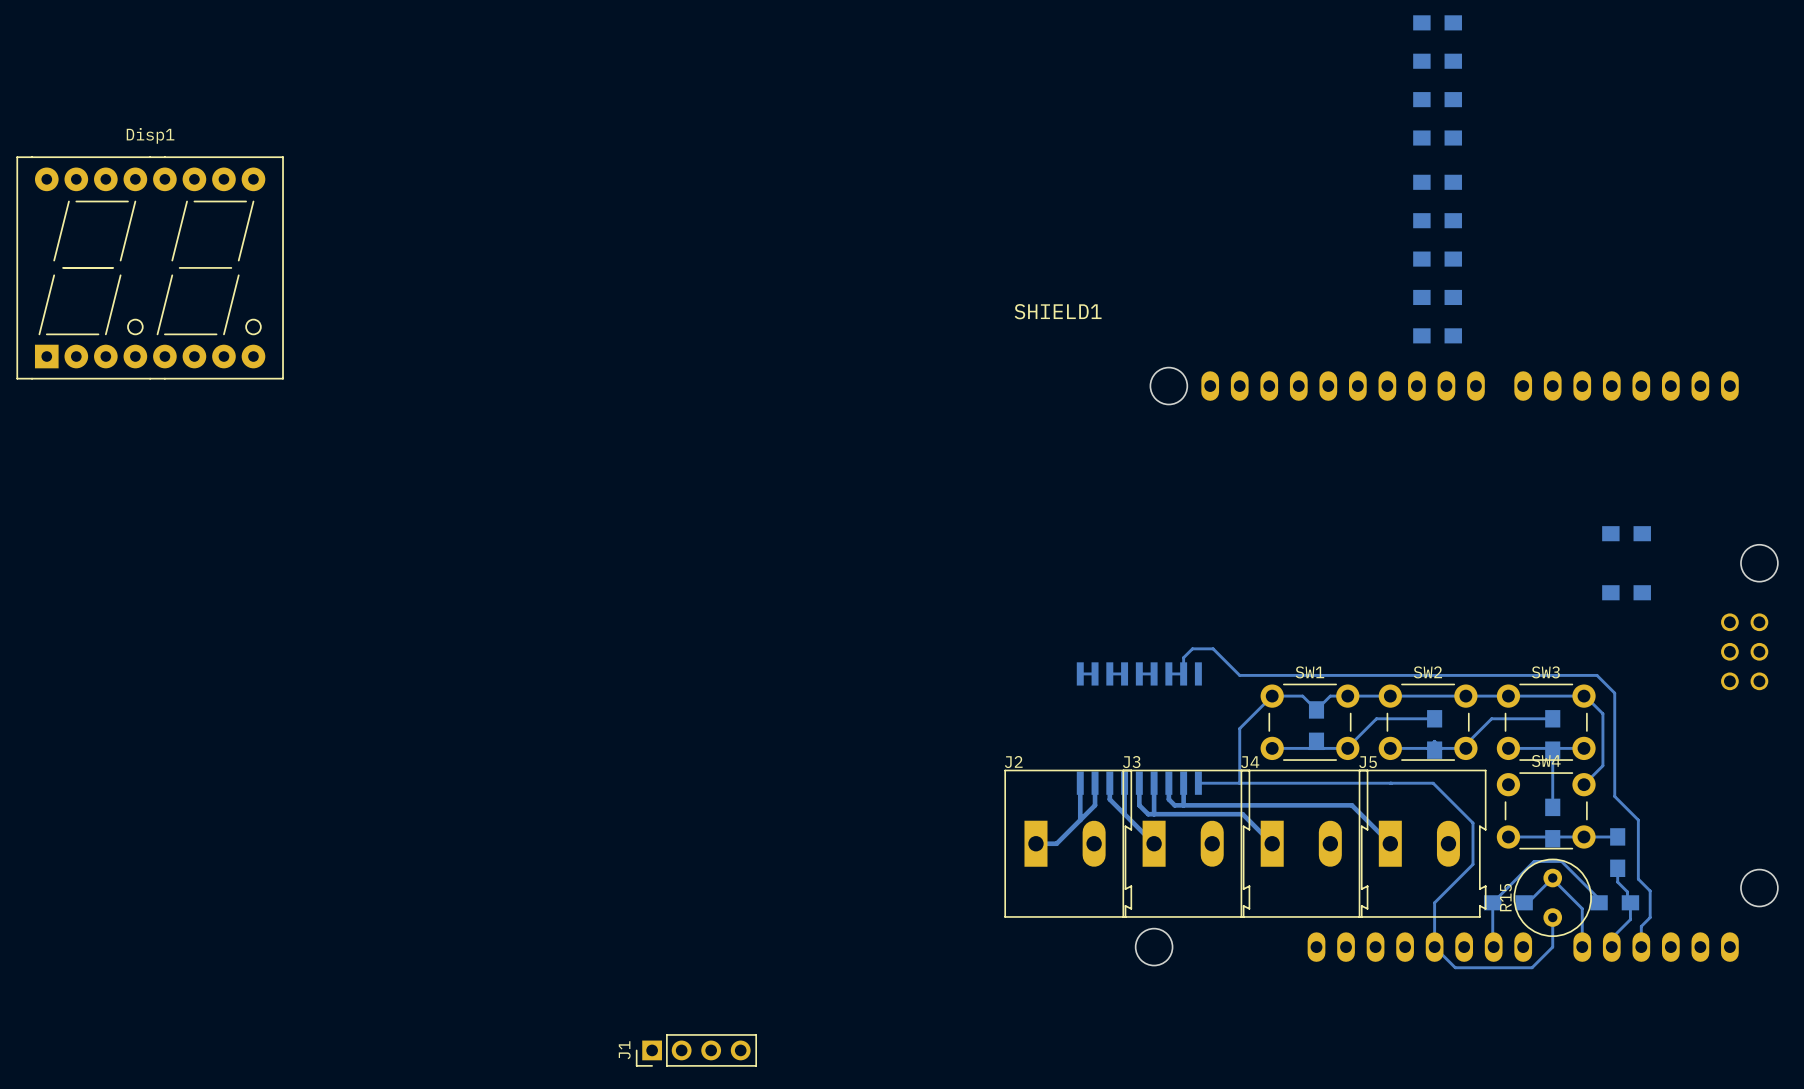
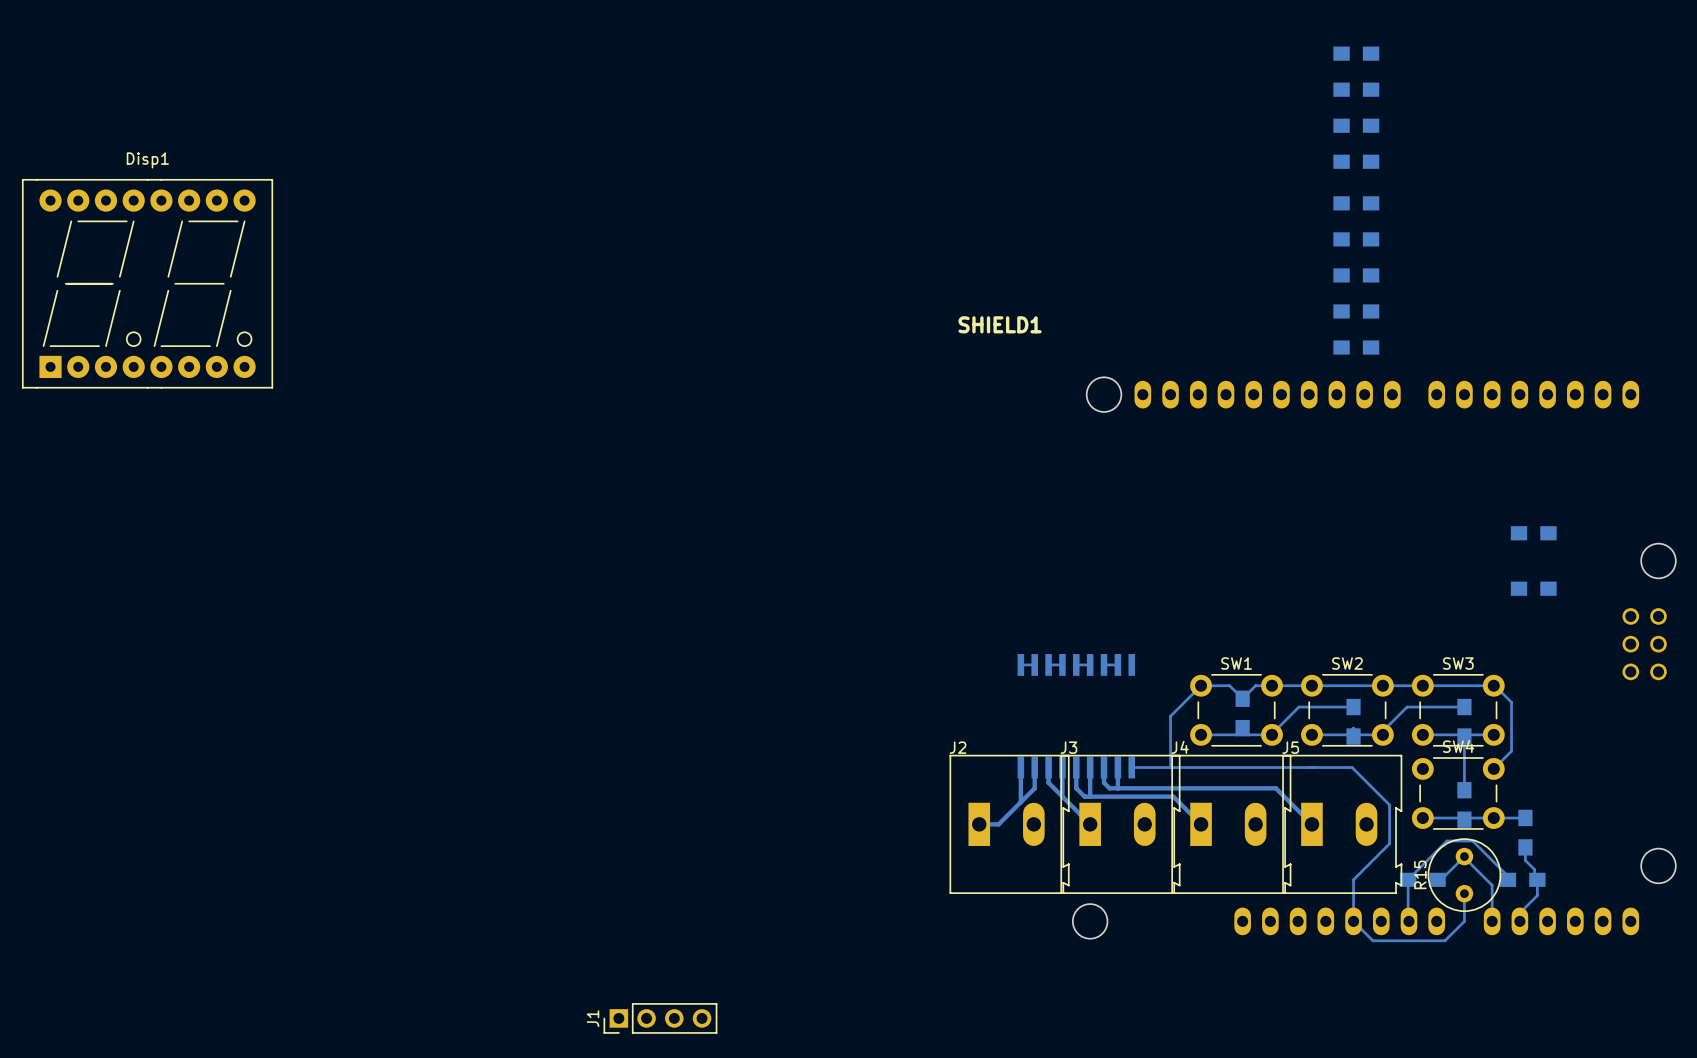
bottom track: (1183, 673) (1183, 657) (1192, 648) (1213, 648) (1239, 675) (1597, 675) (1614, 693) (1614, 796) (1638, 820) (1638, 879) (1650, 890) (1650, 917) (1641, 926) (1641, 947) -> none

